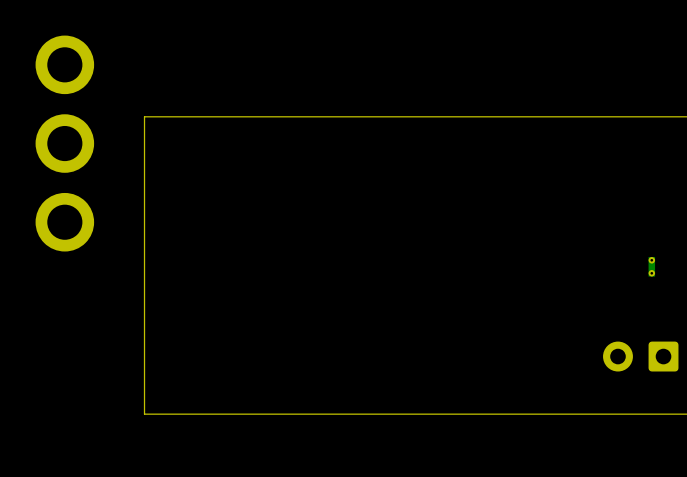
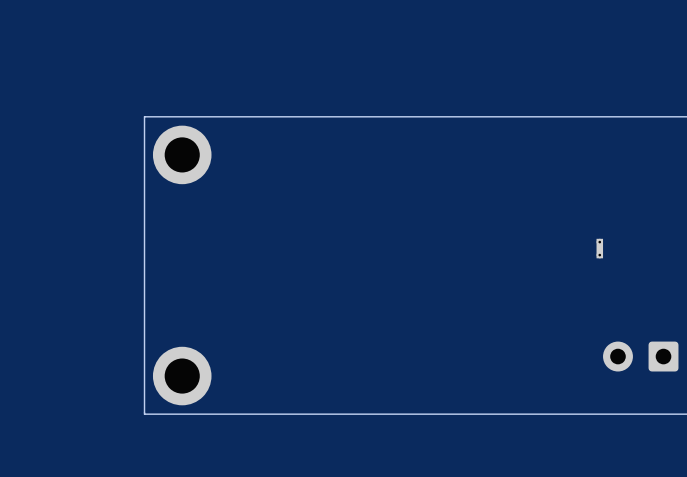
part: (64, 64) -> none
part: (64, 143) -> none
part: none -> (182, 154)
part: (64, 222) -> none
part position: (651, 266) -> (599, 248)
part: none -> (182, 376)

